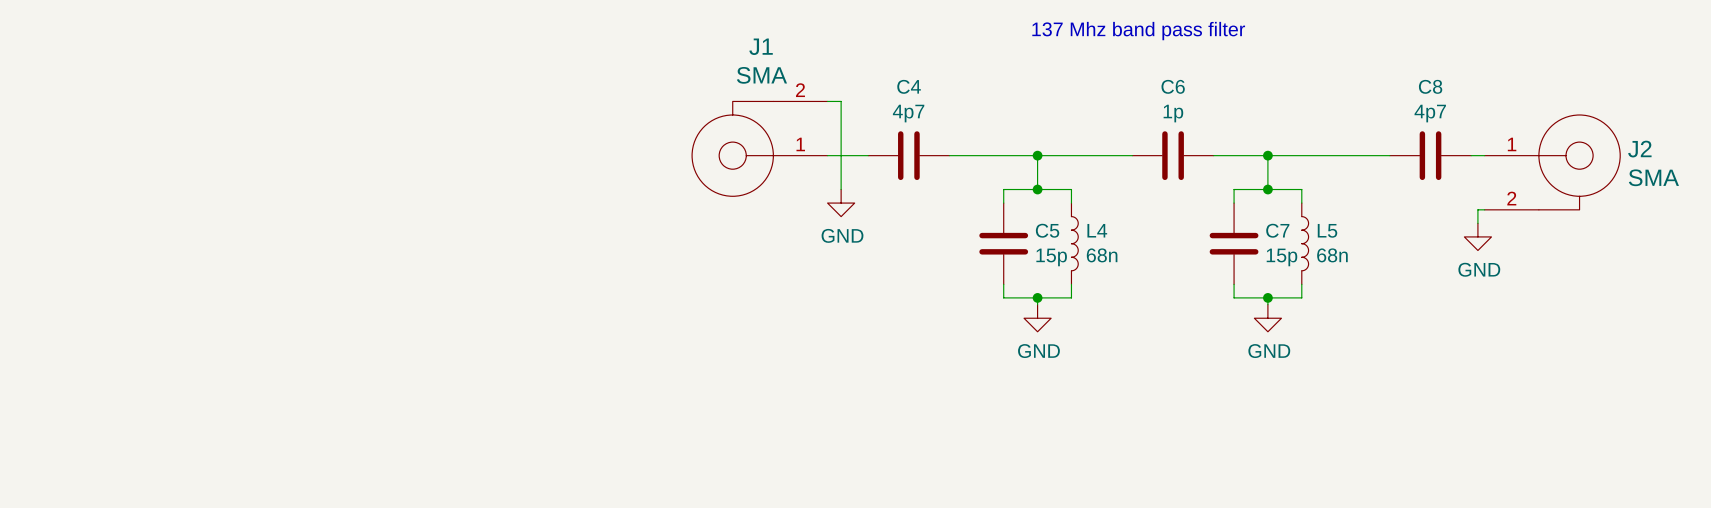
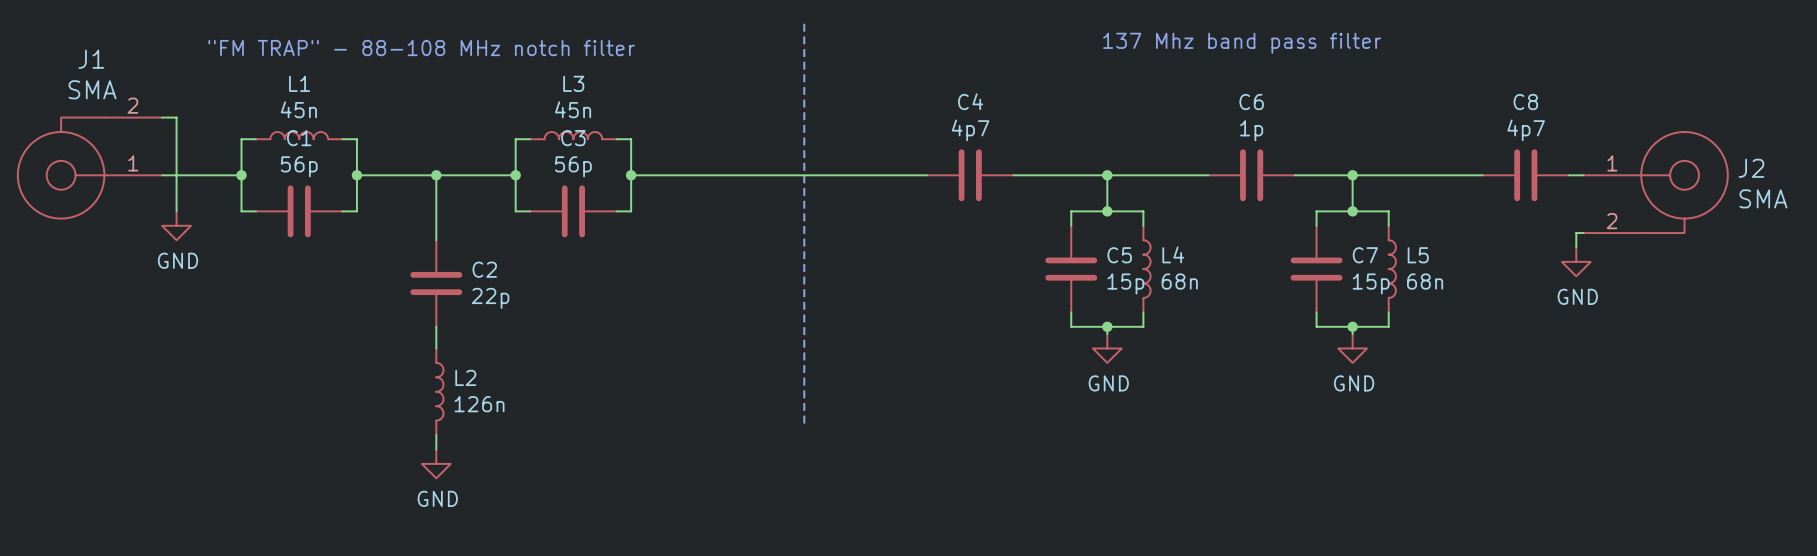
line: none -> (804, 23) (804, 427)
text: none -> "FM TRAP" - 88-108 MHz notch filter (421, 48)
wire: none -> (162, 117) (176, 117) (176, 211)
wire: (827, 101) (841, 101) (841, 189) -> none
L1: none -> 45n (299, 135)
L3: none -> 45n (573, 135)
wire: none -> (255, 139) (241, 139) (241, 211) (255, 211)
wire: none -> (342, 139) (356, 139) (356, 211) (342, 211)
wire: none -> (530, 139) (515, 139) (515, 211) (530, 211)
wire: none -> (616, 139) (631, 139) (631, 211) (616, 211)
J1 position: (759, 148) -> (89, 168)
wire: none -> (162, 175) (241, 175)
junction: none -> (241, 175)
wire: none -> (356, 175) (515, 175)
junction: none -> (356, 175)
wire: none -> (436, 175) (436, 240)
junction: none -> (436, 175)
junction: none -> (515, 175)
wire: none -> (631, 175) (883, 175)
junction: none -> (631, 175)
C1: none -> 56p (299, 211)
C3: none -> 56p (573, 211)
power symbol: none -> GND (176, 225)
power symbol: GND (841, 203) -> none
C2: none -> 22p (436, 283)
wire: none -> (436, 326) (436, 348)
L2: none -> 126n (439, 391)
wire: none -> (436, 435) (436, 449)
power symbol: none -> GND (436, 463)

